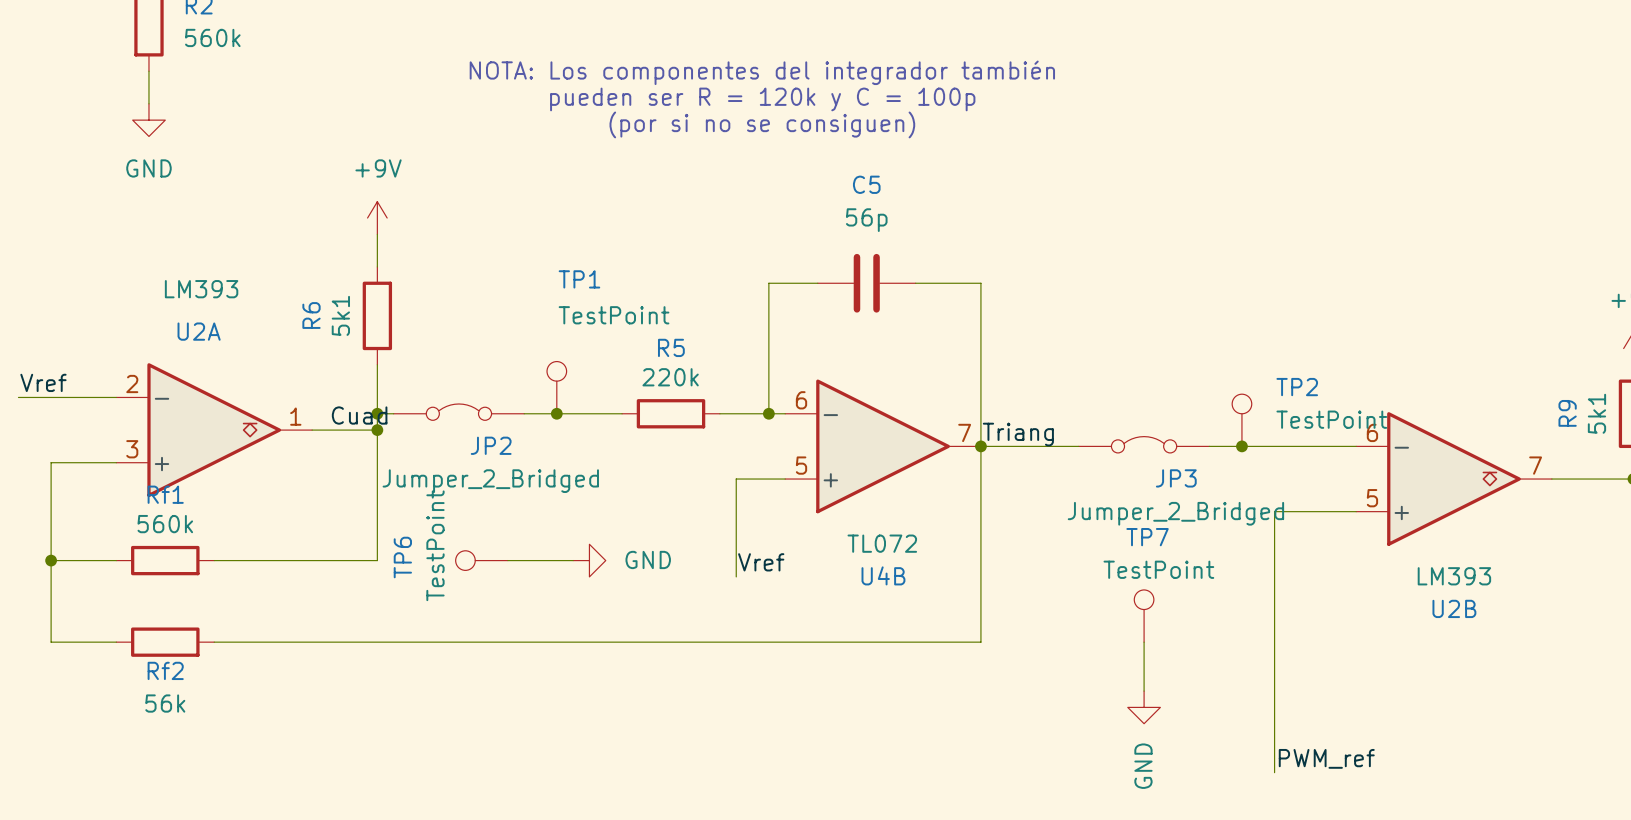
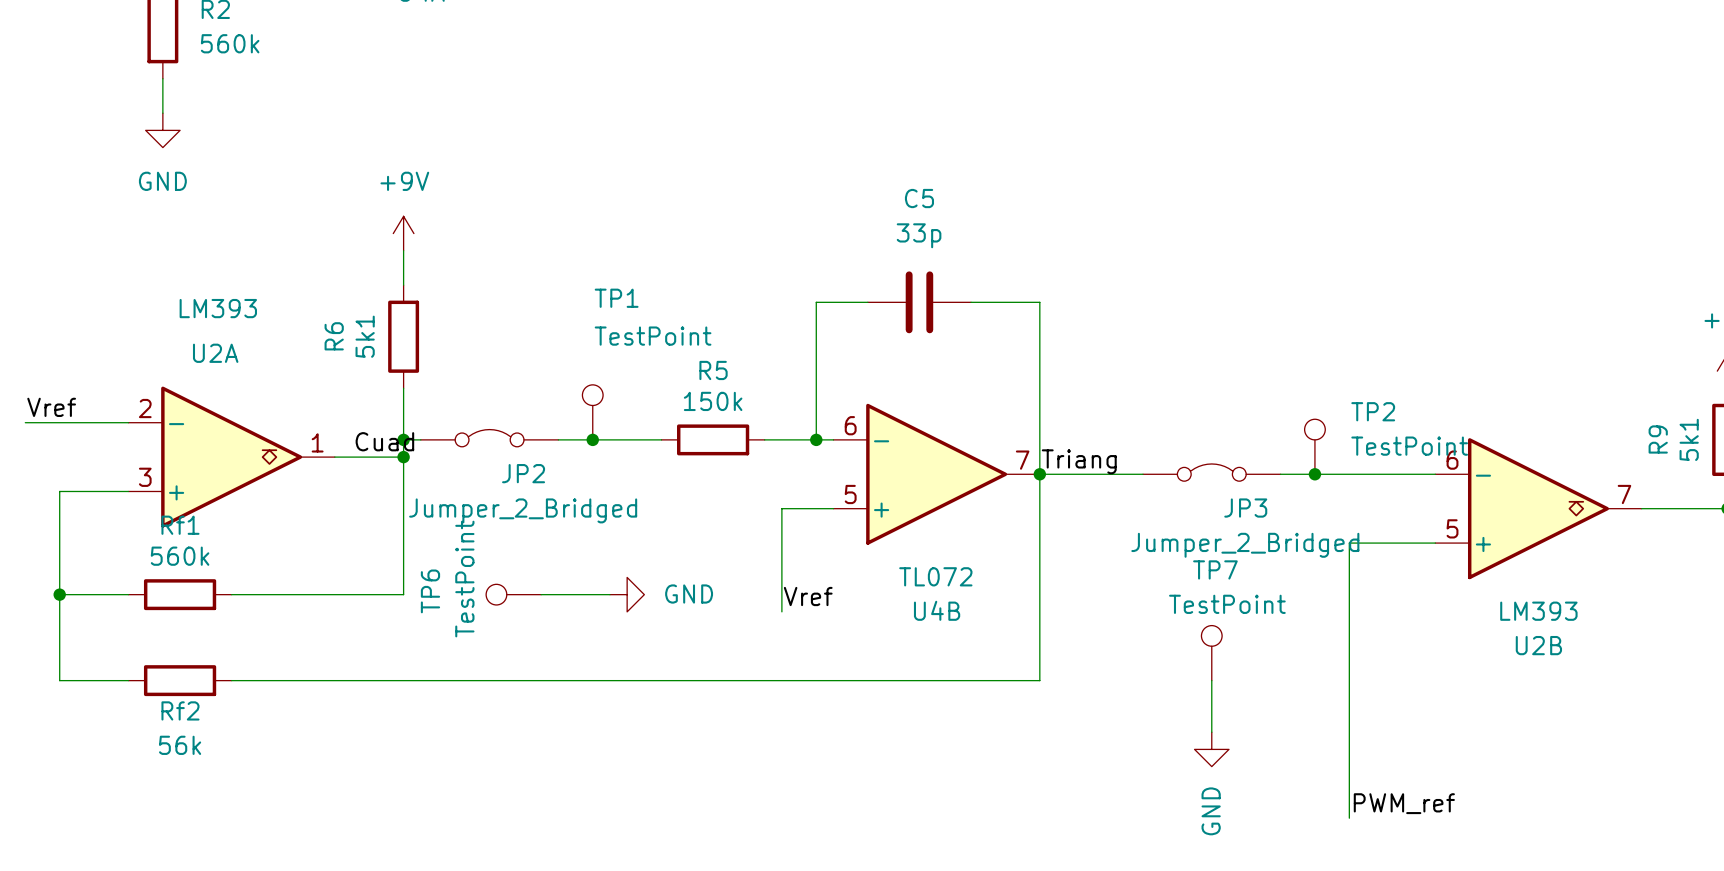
text: NOTA: Los componentes del integrador también (762, 72) -> none
text: pueden ser R = 120k y C = 100p (762, 99) -> none
text: (por si no se consiguen) (762, 124) -> none
C5 value: 56p (866, 220) -> 33p (919, 235)
R5 value: 220k (670, 377) -> 150k (713, 401)

